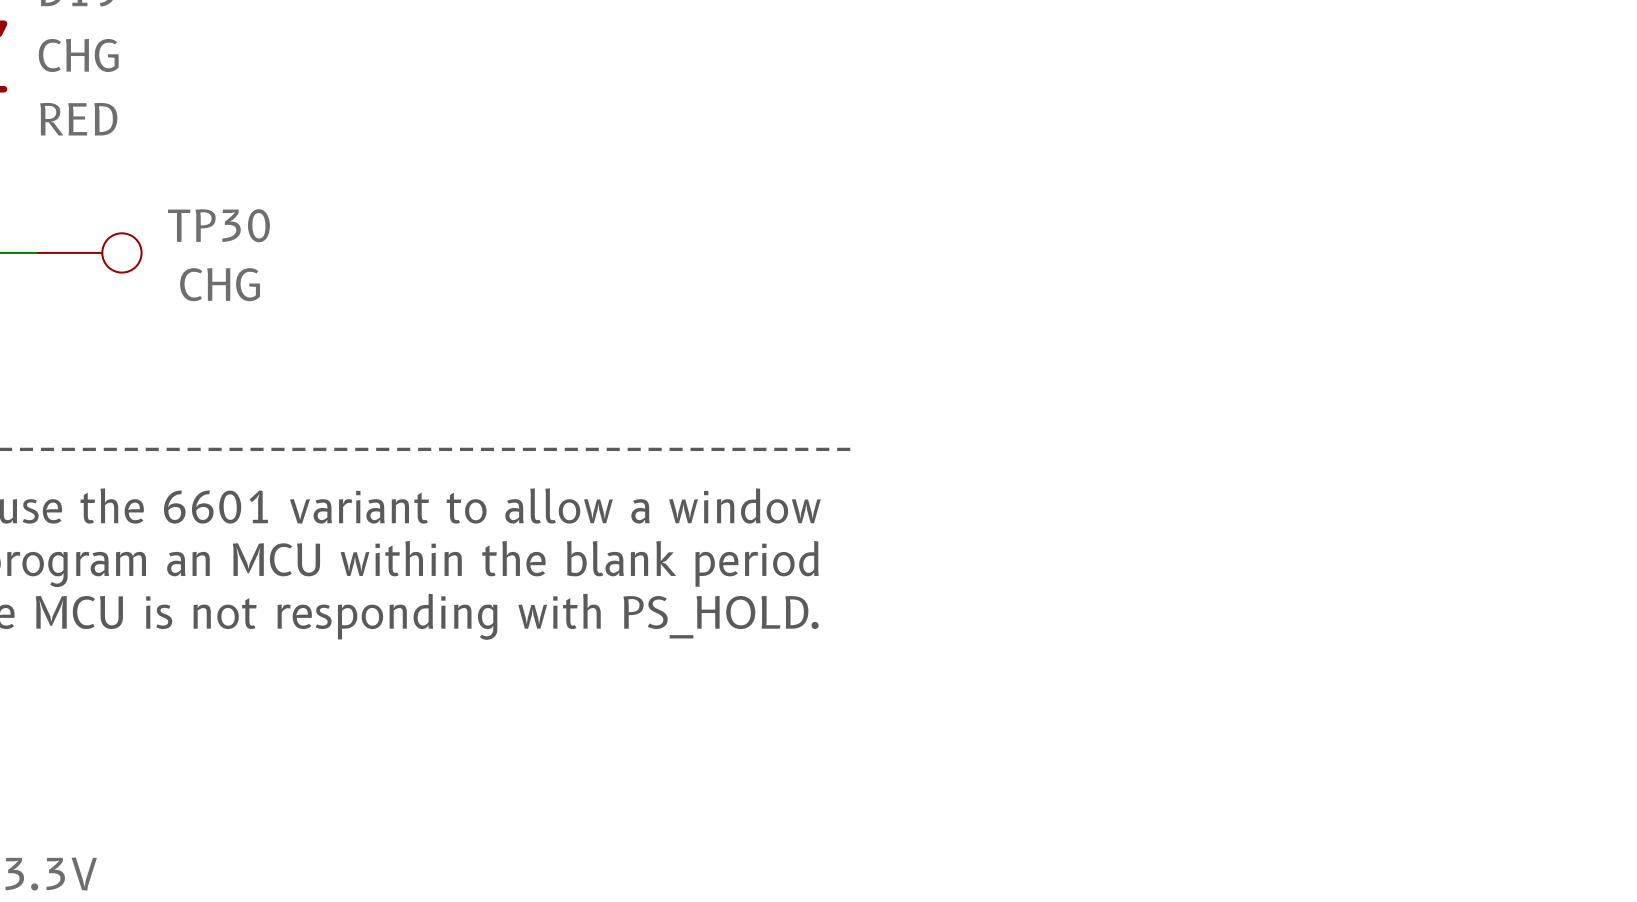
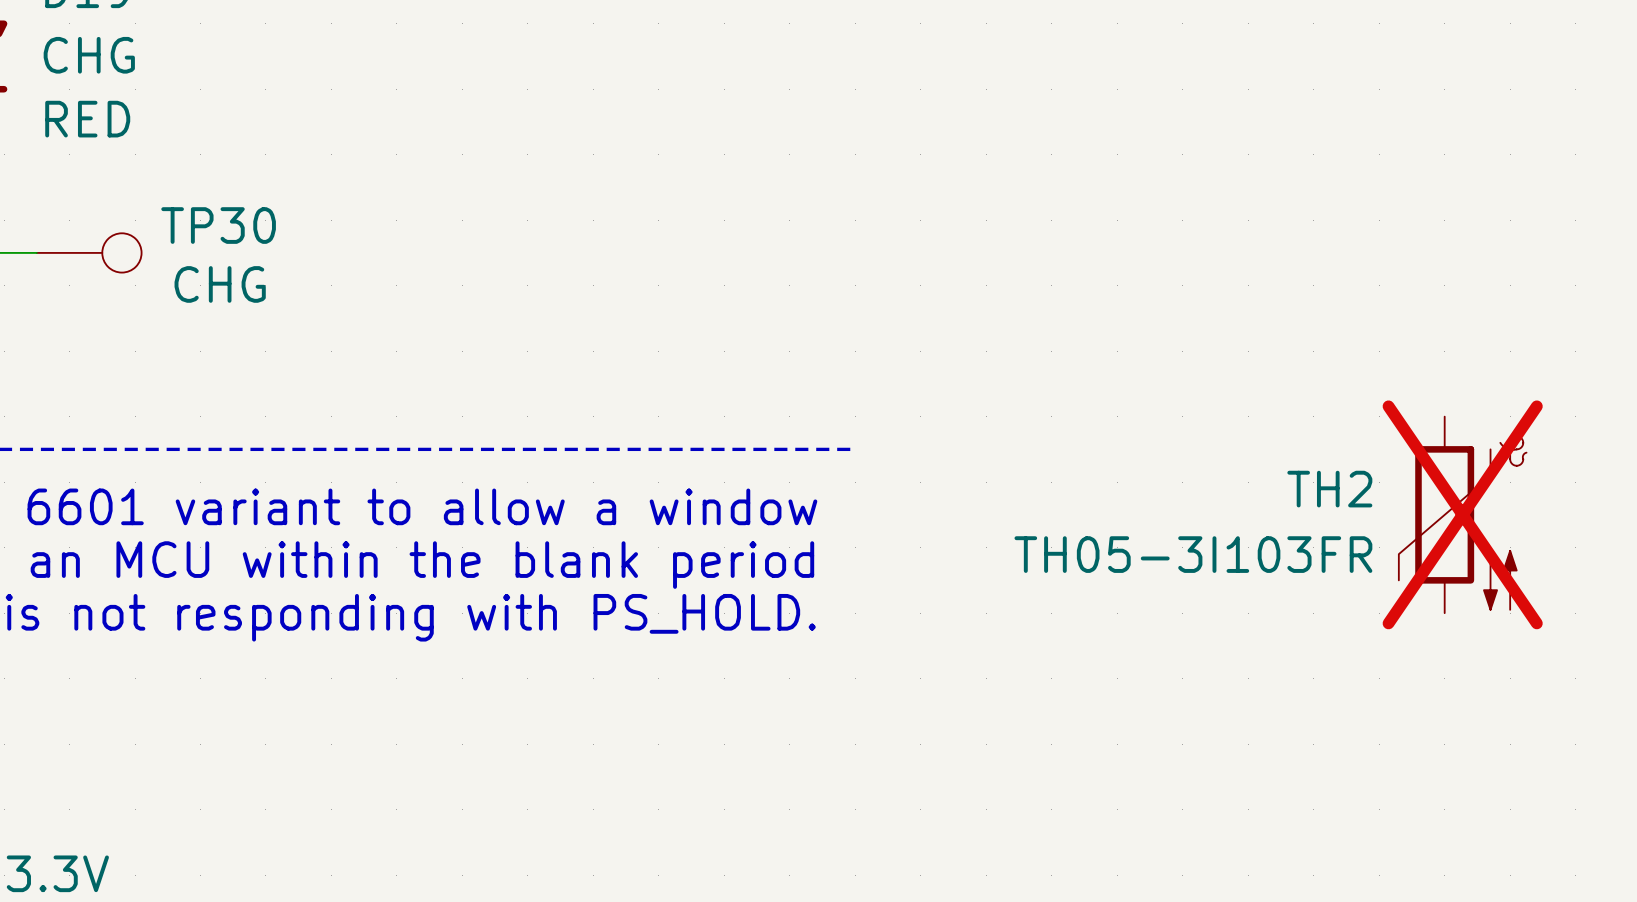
TH2: none -> TH05-3I103FR (1462, 514)

